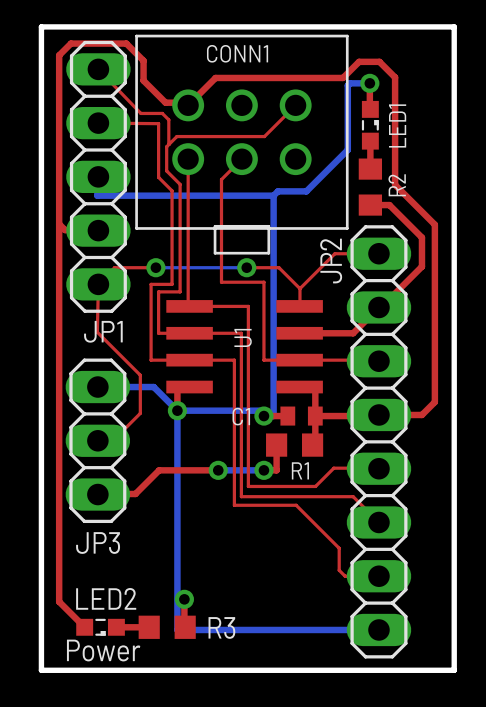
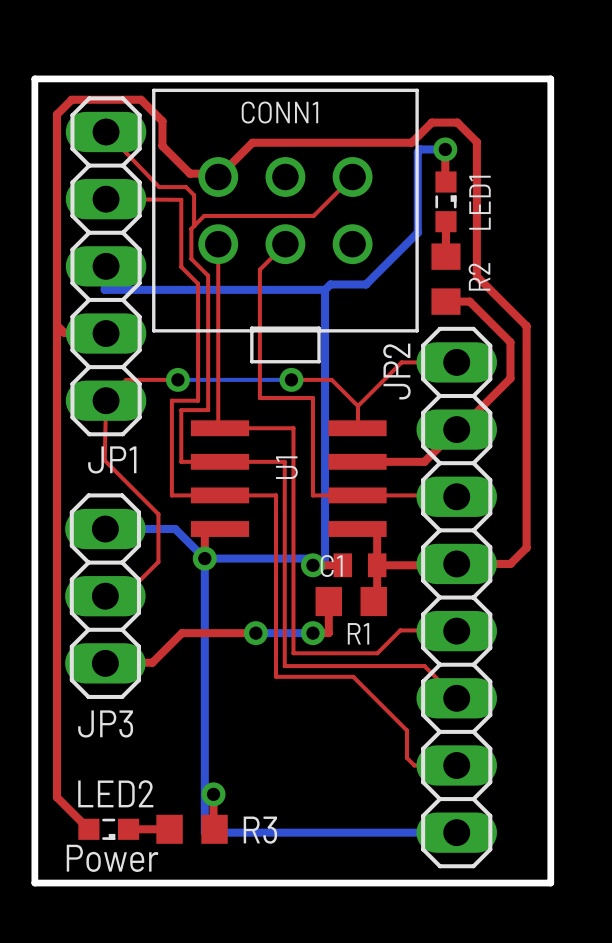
C1 name position: C1 (241, 416) -> C1 (331, 565)

